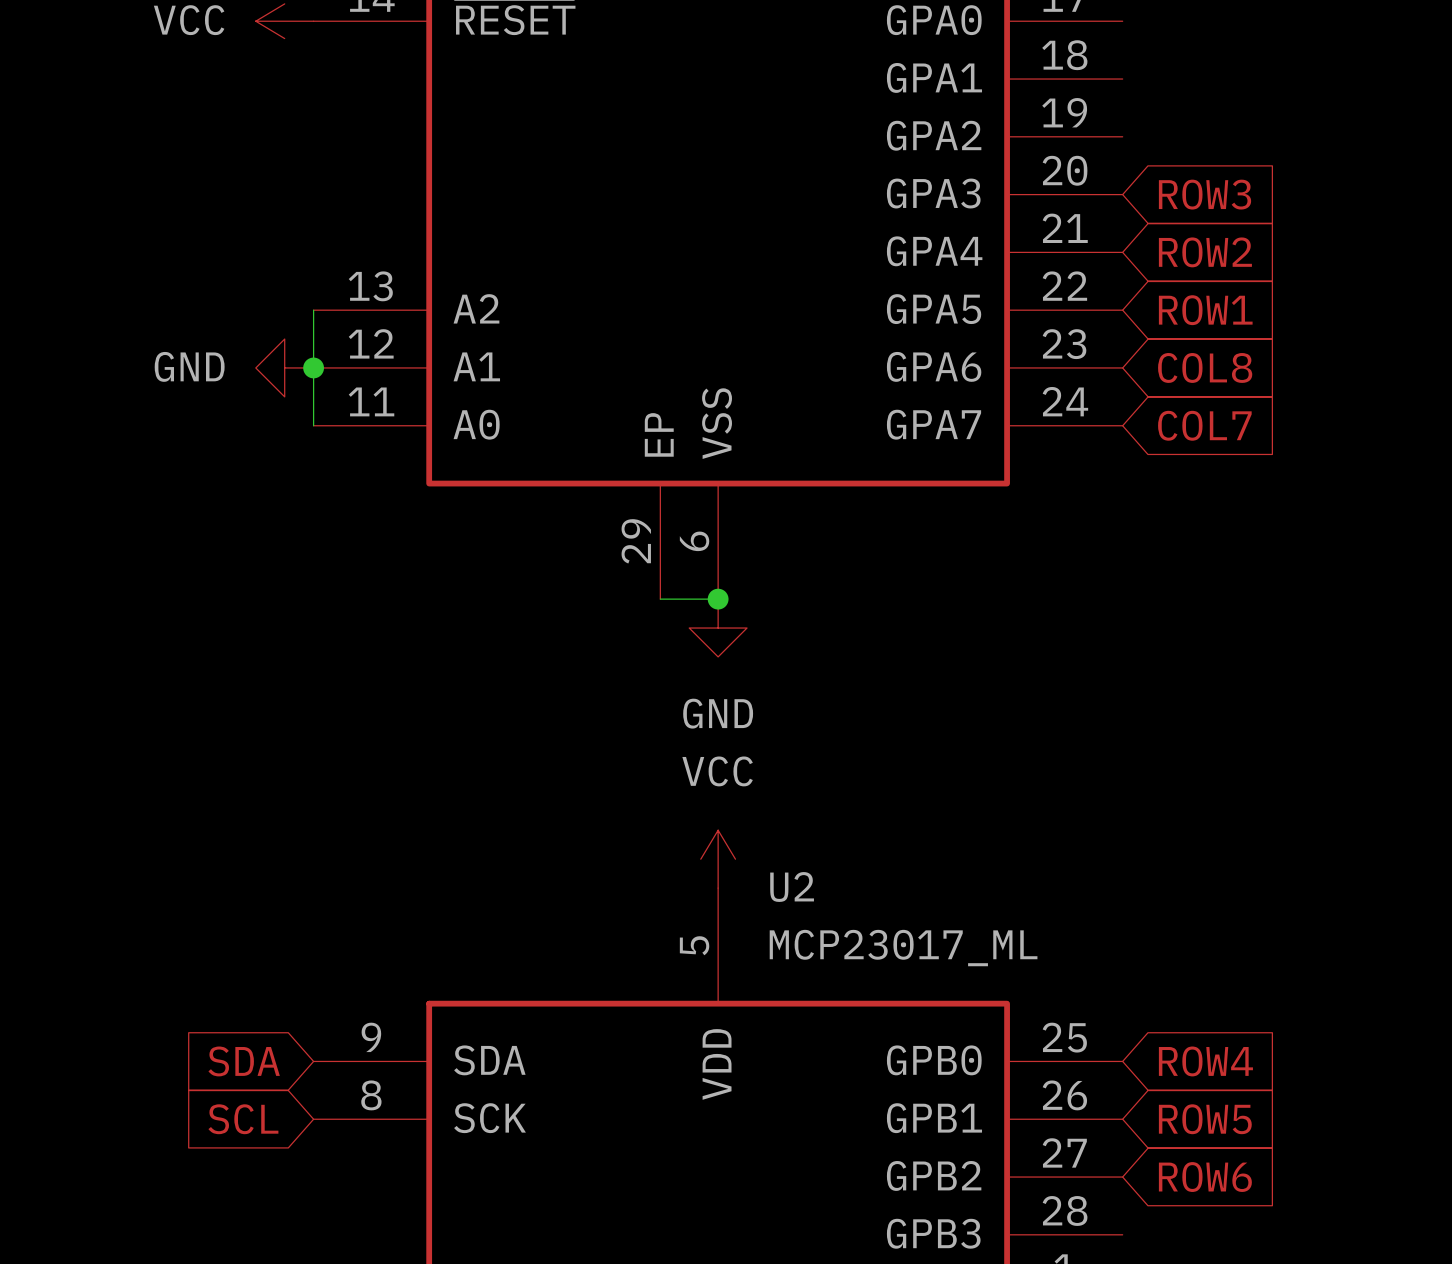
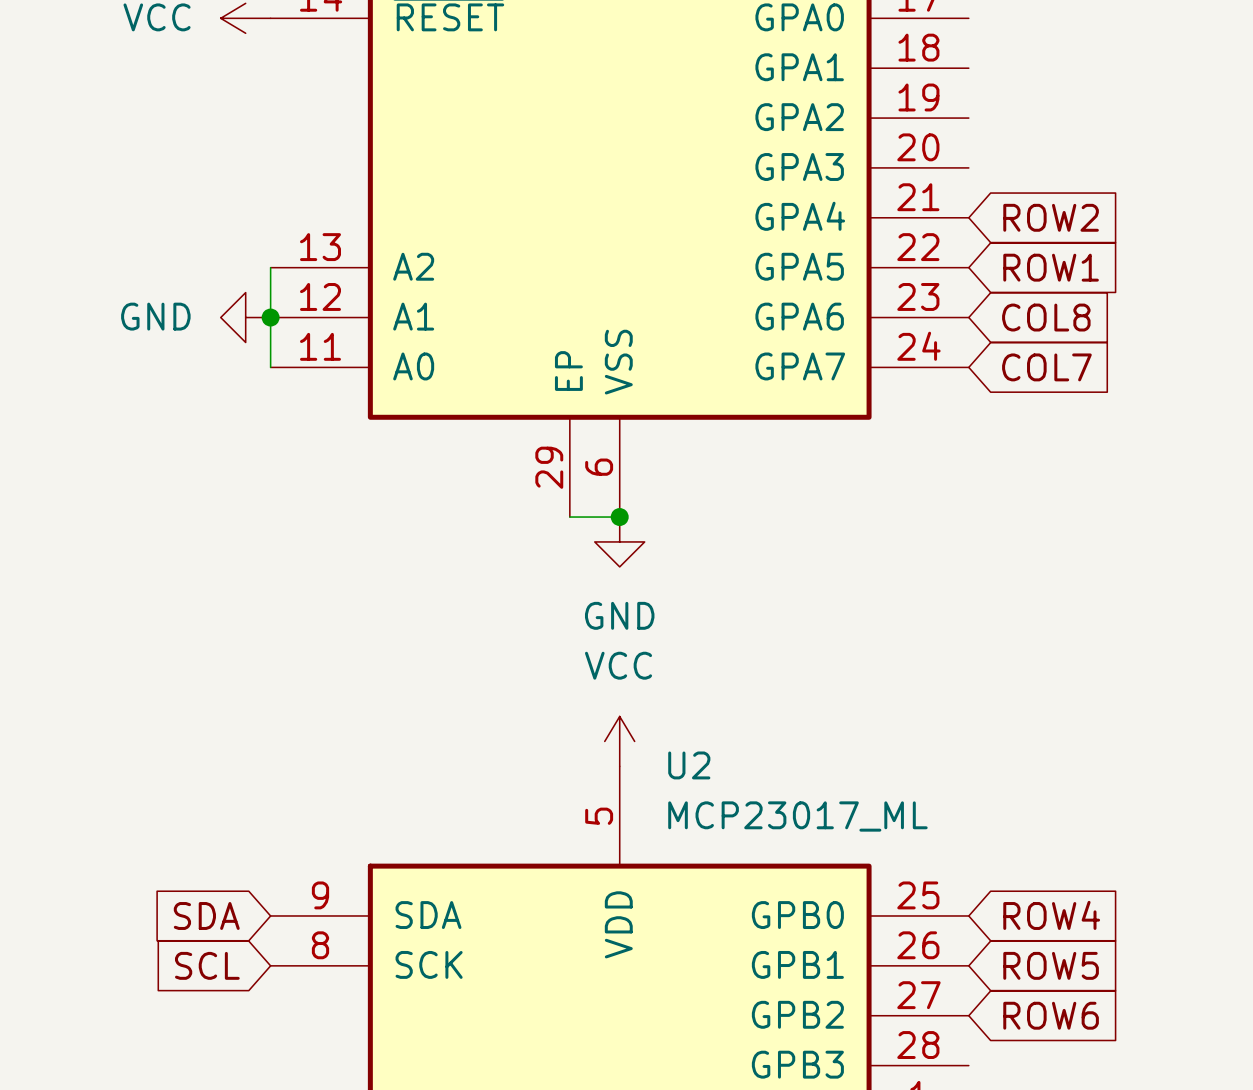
global label: ROW3 (1205, 194) -> none

